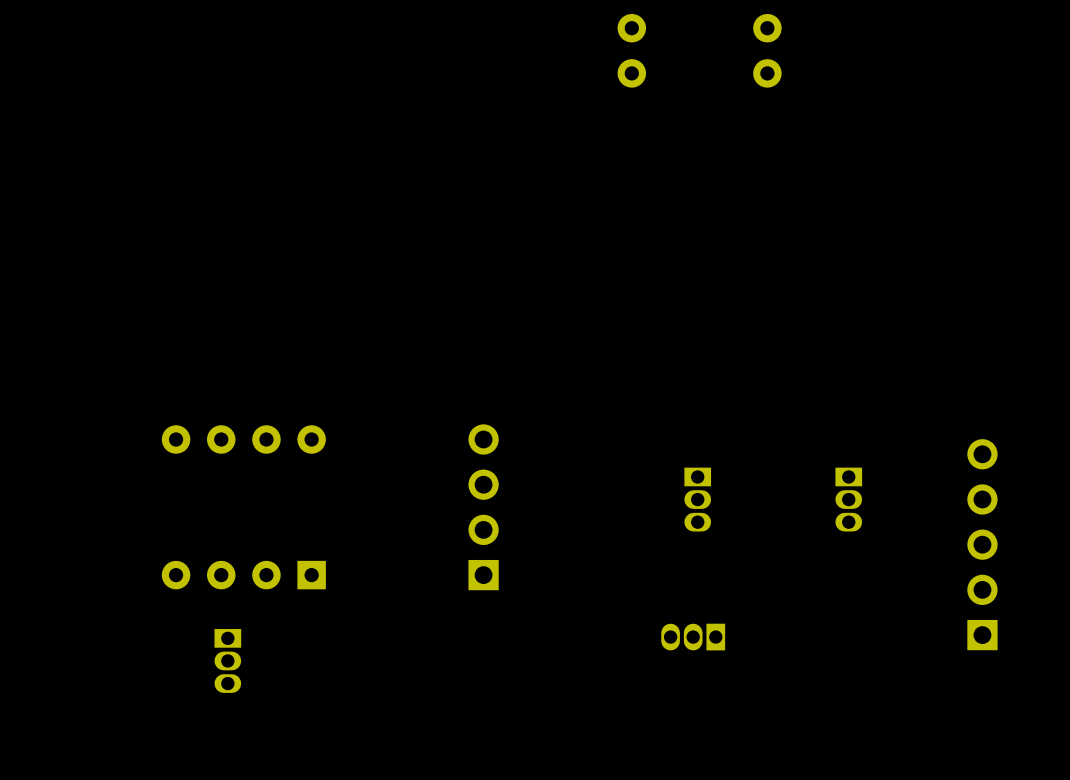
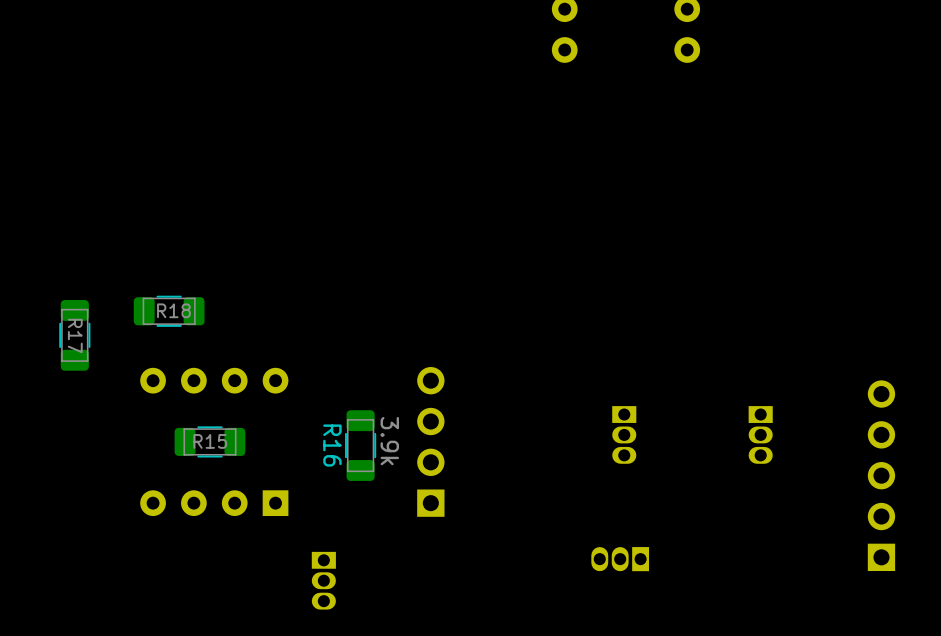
R18: none -> (169, 311)
R17: none -> (74, 335)
R15: none -> (209, 441)
R16: none -> 3.9k (360, 445)
part position: (227, 660) -> (323, 580)

